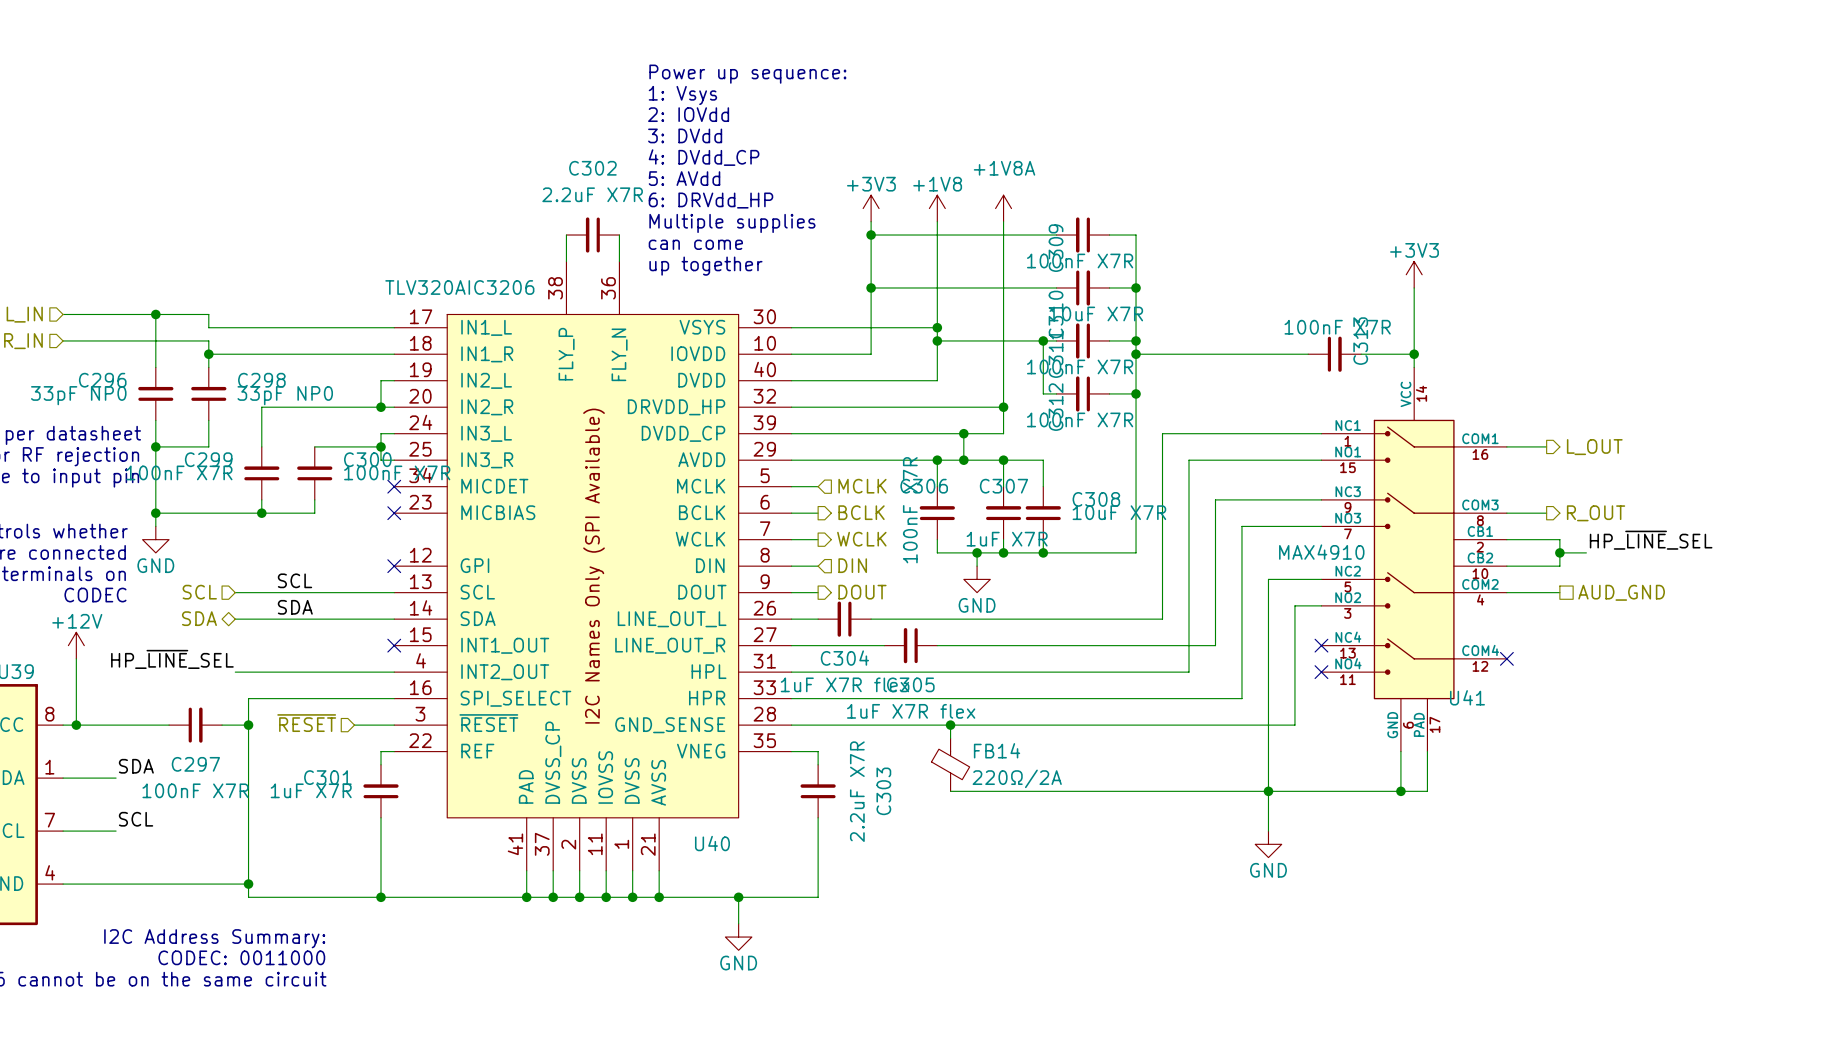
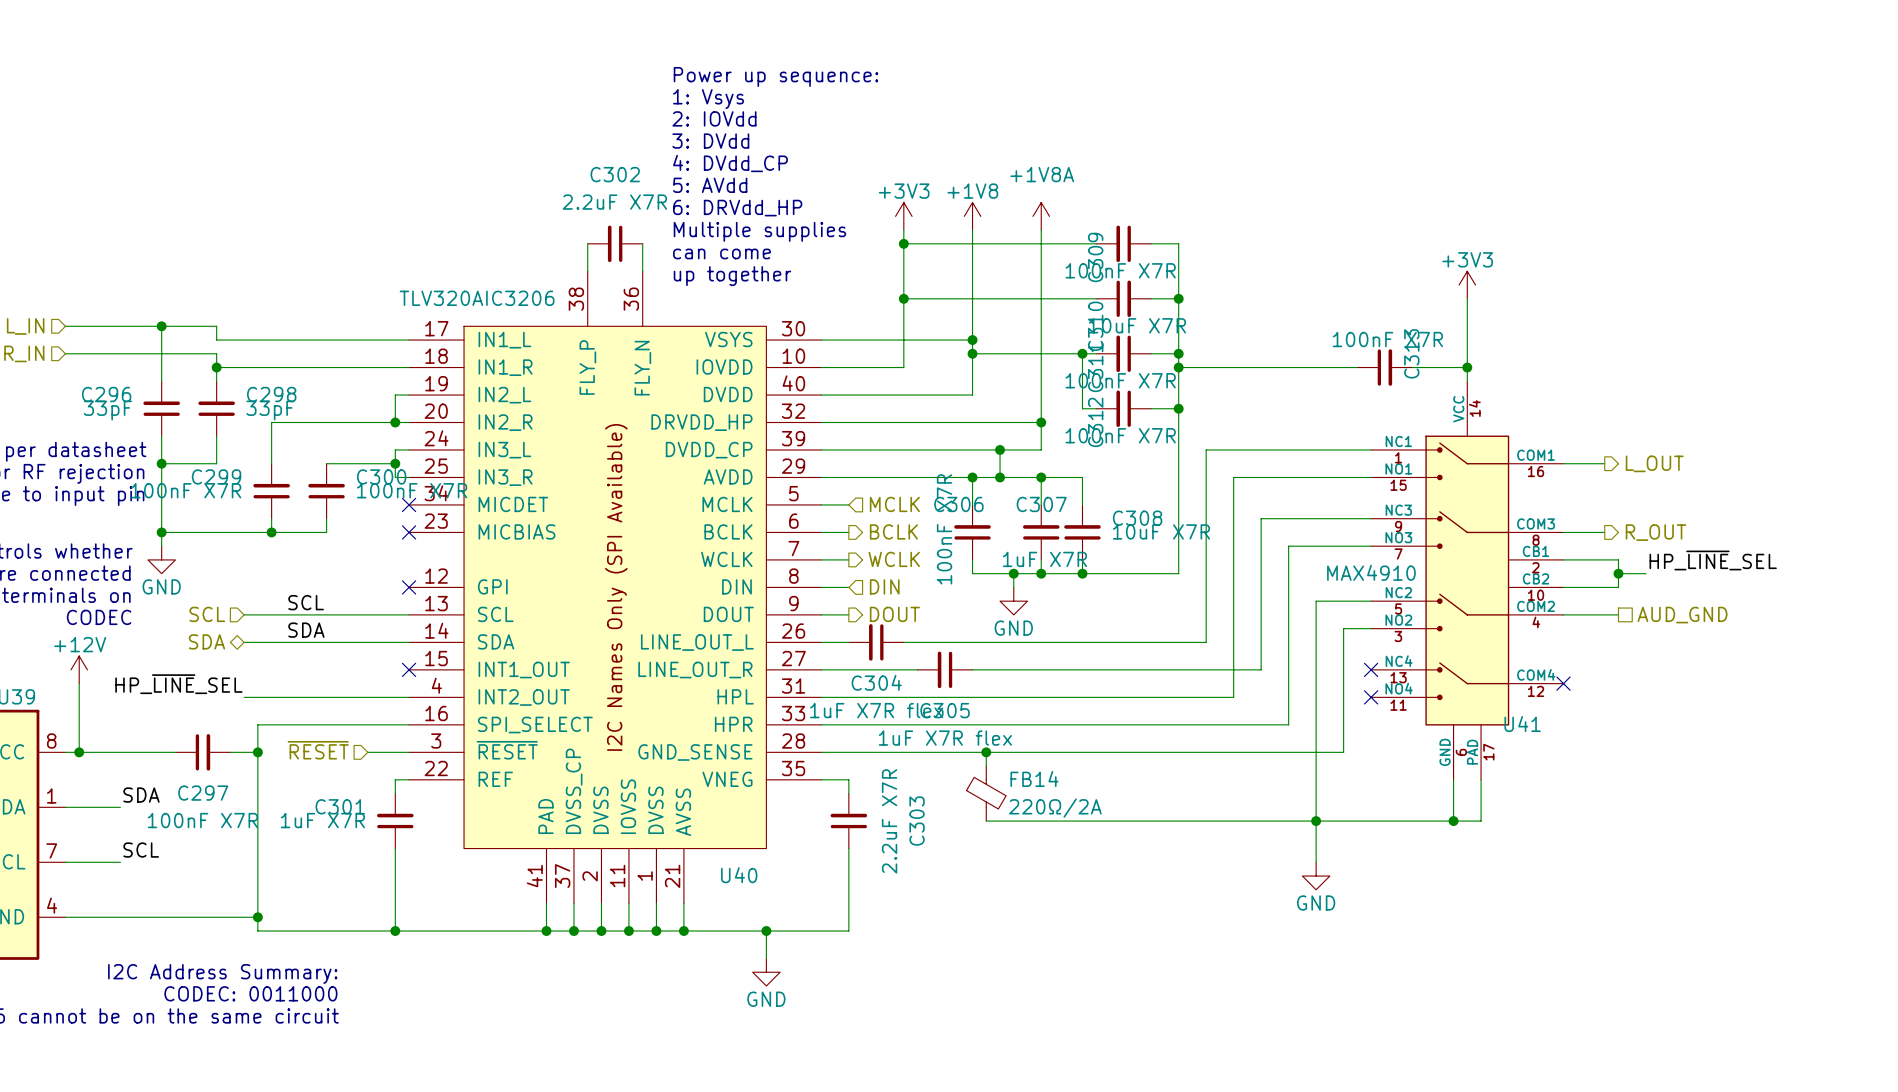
C296 value: 33pF NP0 (78, 395) -> 33pF (107, 410)
C298 value: 33pF NP0 (285, 395) -> 33pF (270, 410)

